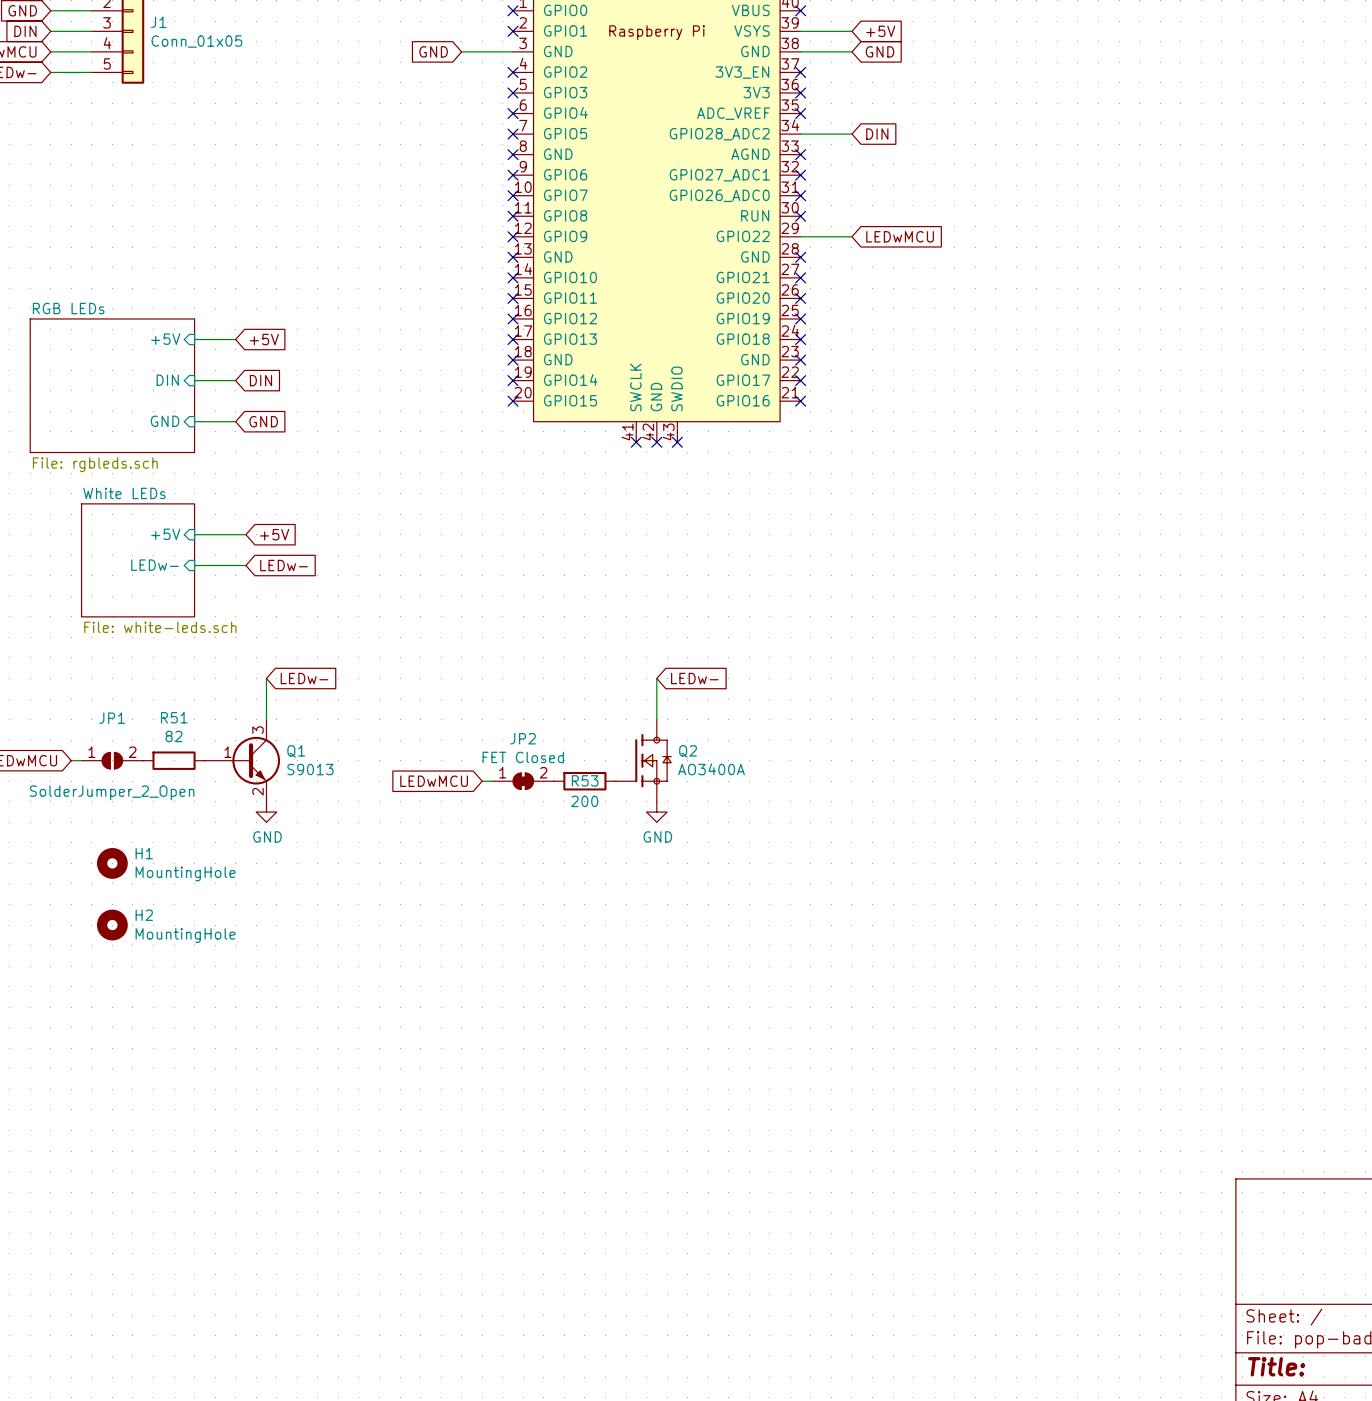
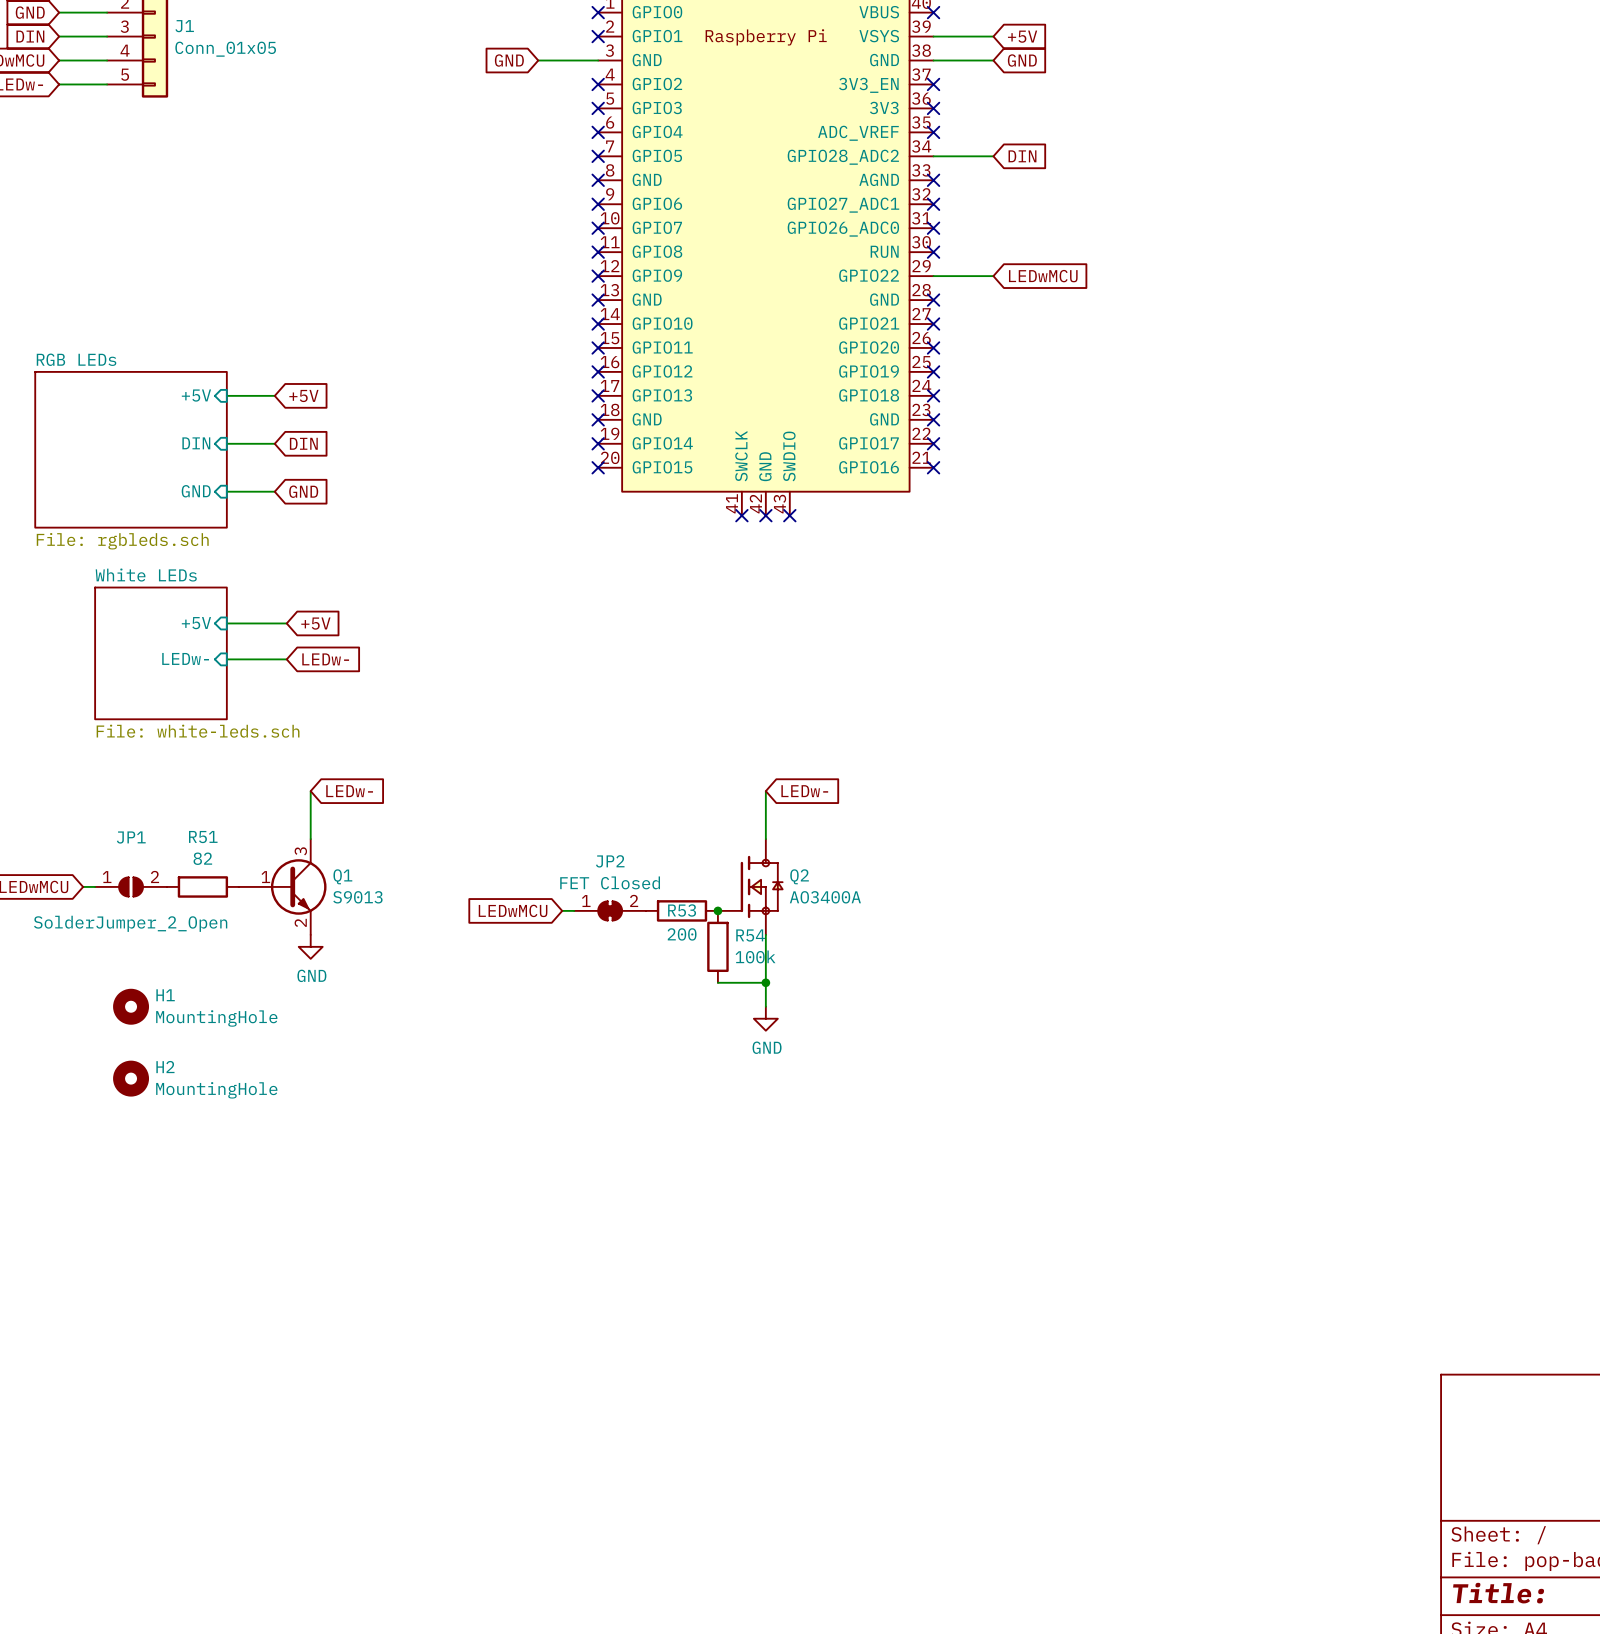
junction: none -> (717, 910)
wire: none -> (765, 934) (765, 1006)
R54: none -> 100k (717, 946)
power symbol position: GND (656, 812) -> GND (765, 1018)
wire: none -> (717, 982) (765, 982)
junction: none -> (765, 982)

